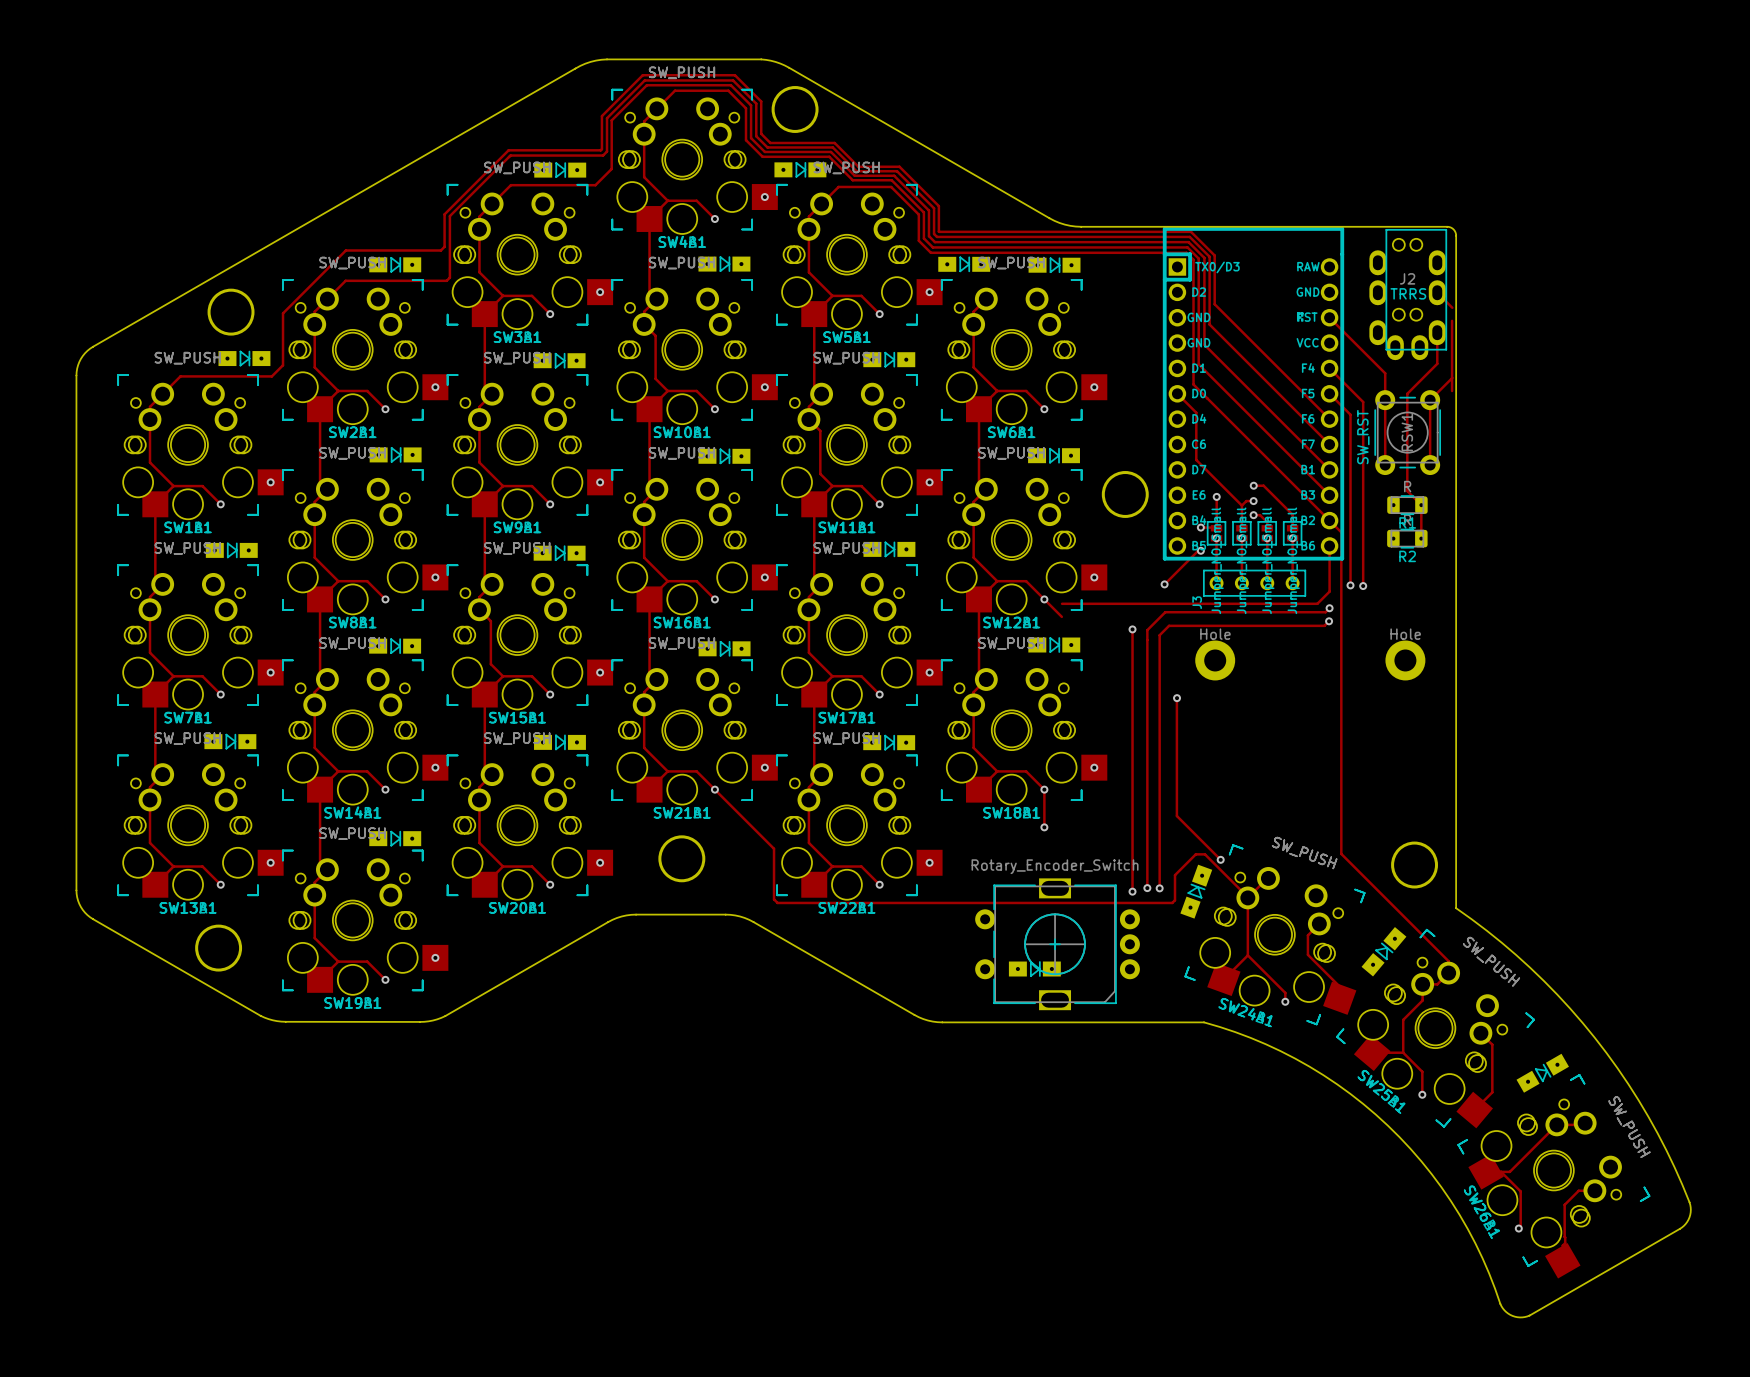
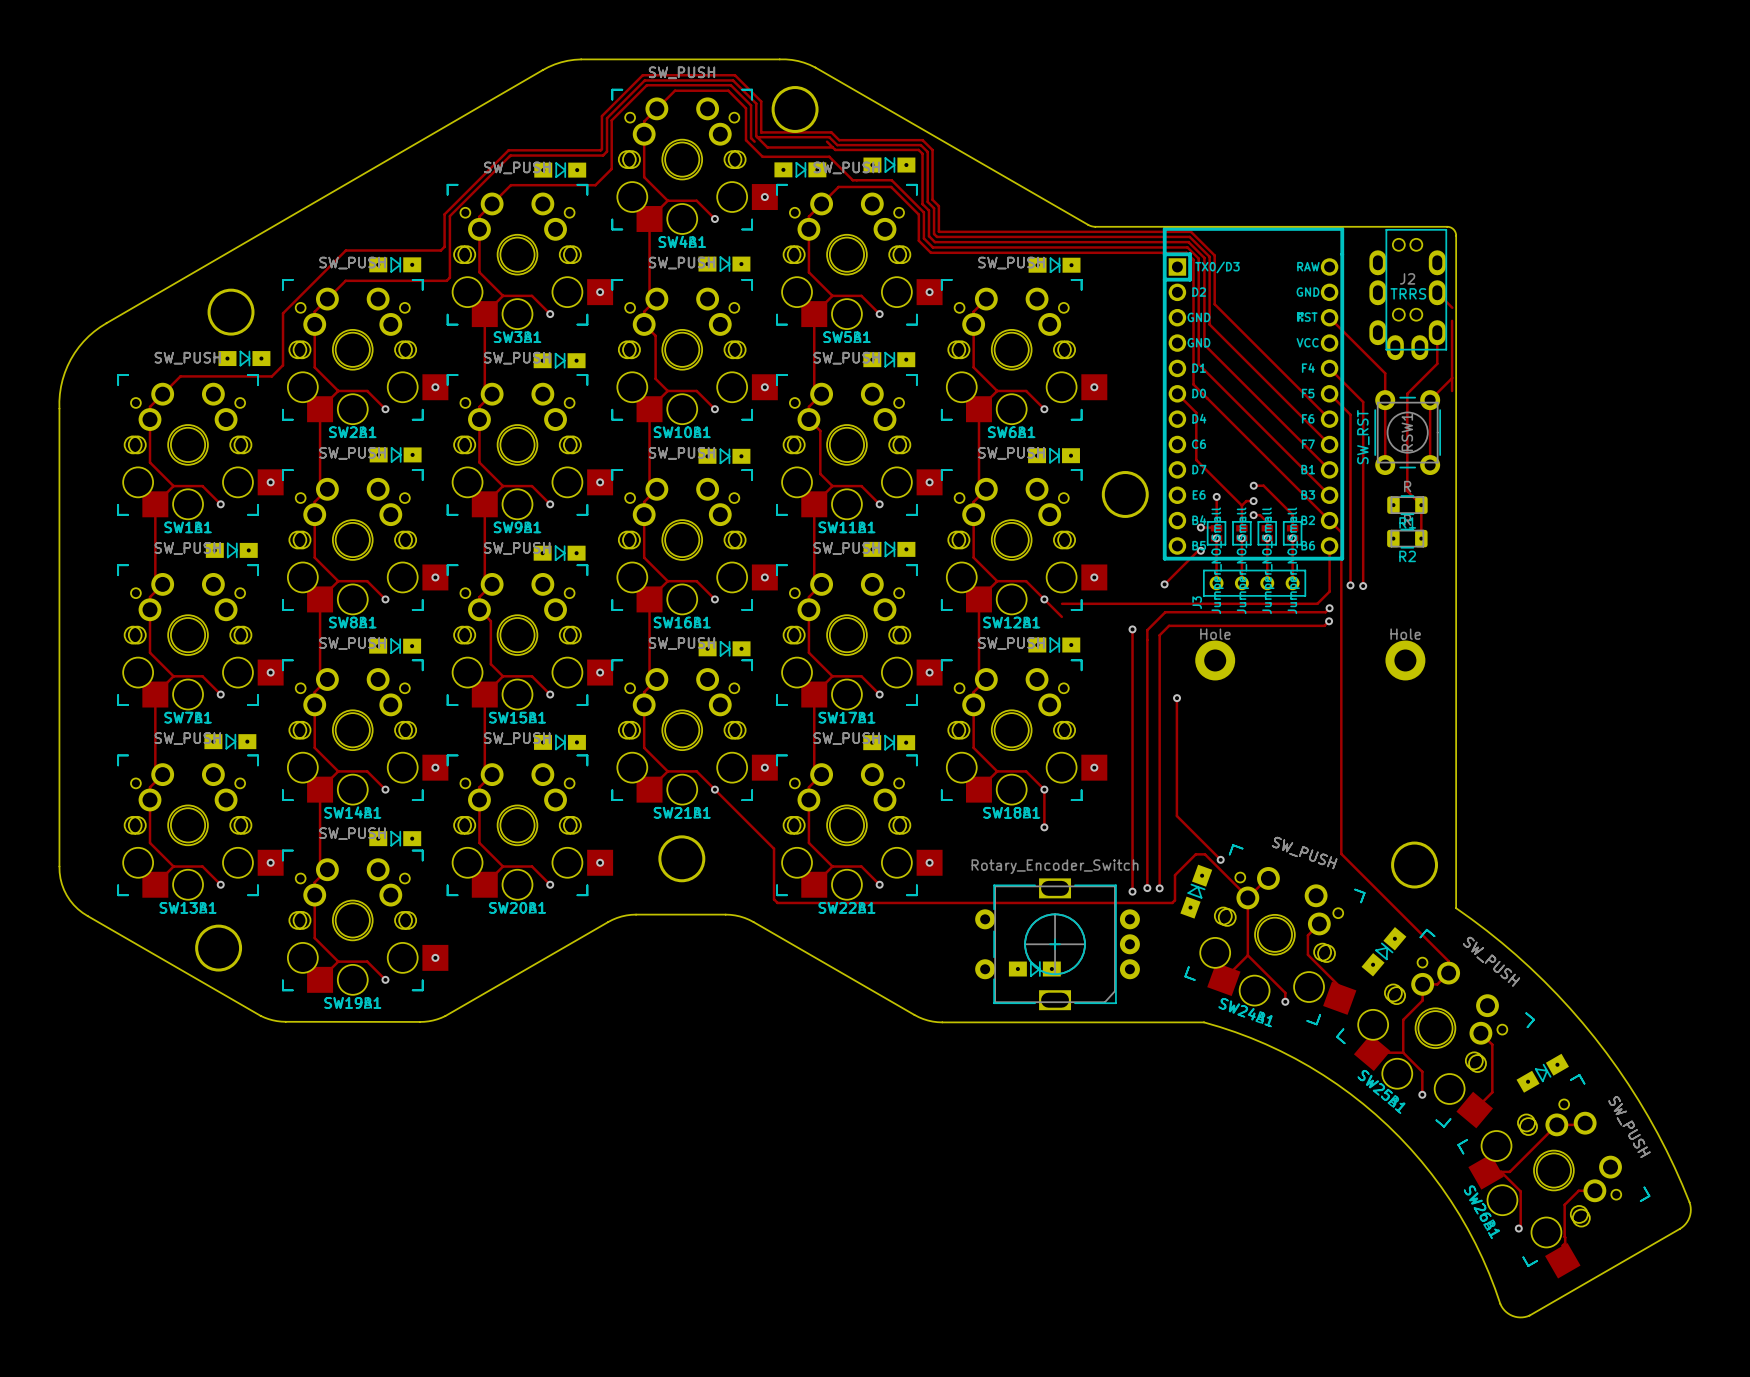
board edge: (607, 59) (590, 61) (575, 68) (93, 346) (84, 353) (78, 365) (76, 375) (76, 890) (78, 900) (84, 912) (93, 919) (260, 1015) -> (607, 59) (567, 60) (542, 70) (100, 327) (78, 347) (64, 372) (59, 401) (59, 866) (61, 884) (69, 900) (82, 912) (260, 1015)
board edge: (761, 59) (775, 61) (789, 67) (1054, 220) (1070, 225) (1095, 226) -> (761, 59) (792, 59) (815, 67) (1088, 224) (1095, 226)
track: (761, 132) (770, 142) (834, 142) (858, 166) (899, 166) (932, 199) -> (761, 132) (831, 132) (839, 140) (922, 140) (932, 150) (932, 199)
track: none -> (757, 137) (829, 137) (837, 145) (920, 145) (927, 151) (927, 201)
track: (754, 141) (764, 151) (830, 151) (854, 175) (894, 175) (922, 204) -> none
track: (835, 149) (856, 171) (897, 171) (927, 201) -> (835, 149) (918, 149) (922, 153) (922, 204)
part position: (964, 264) -> (889, 165)

